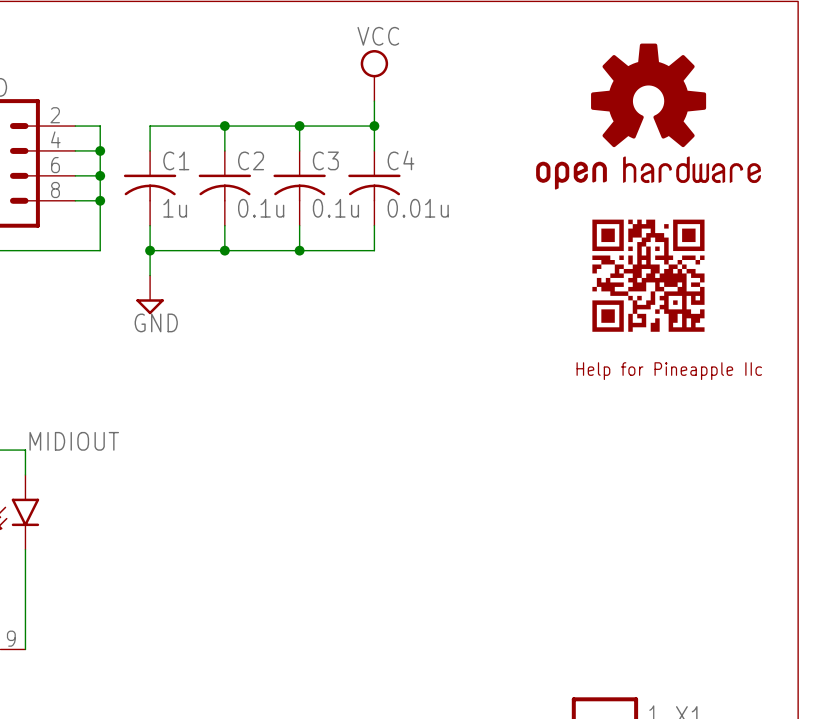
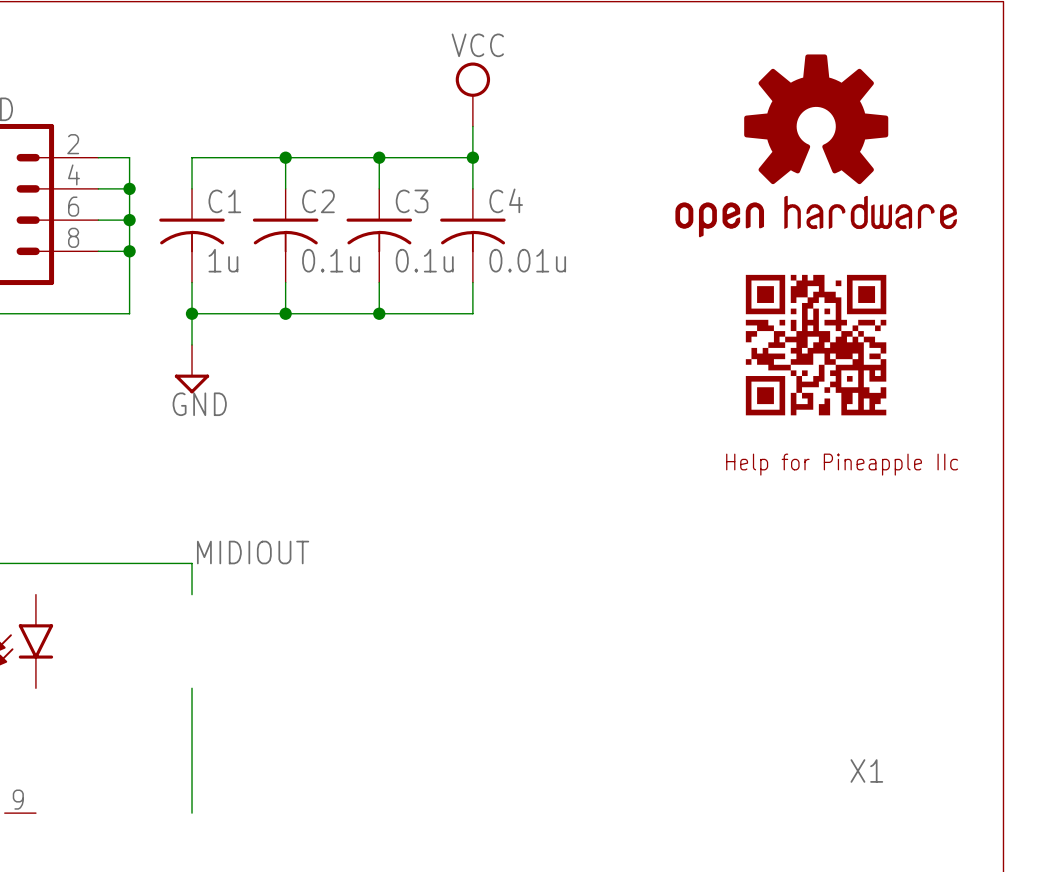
label position: MIDIOUT (74, 441) -> MIDIOUT (253, 552)
wire: (25, 450) (25, 474) -> (35, 563) (192, 563) (192, 594)
wire: (25, 549) (25, 649) -> (192, 688) (192, 813)
label: none -> X1 (866, 770)

